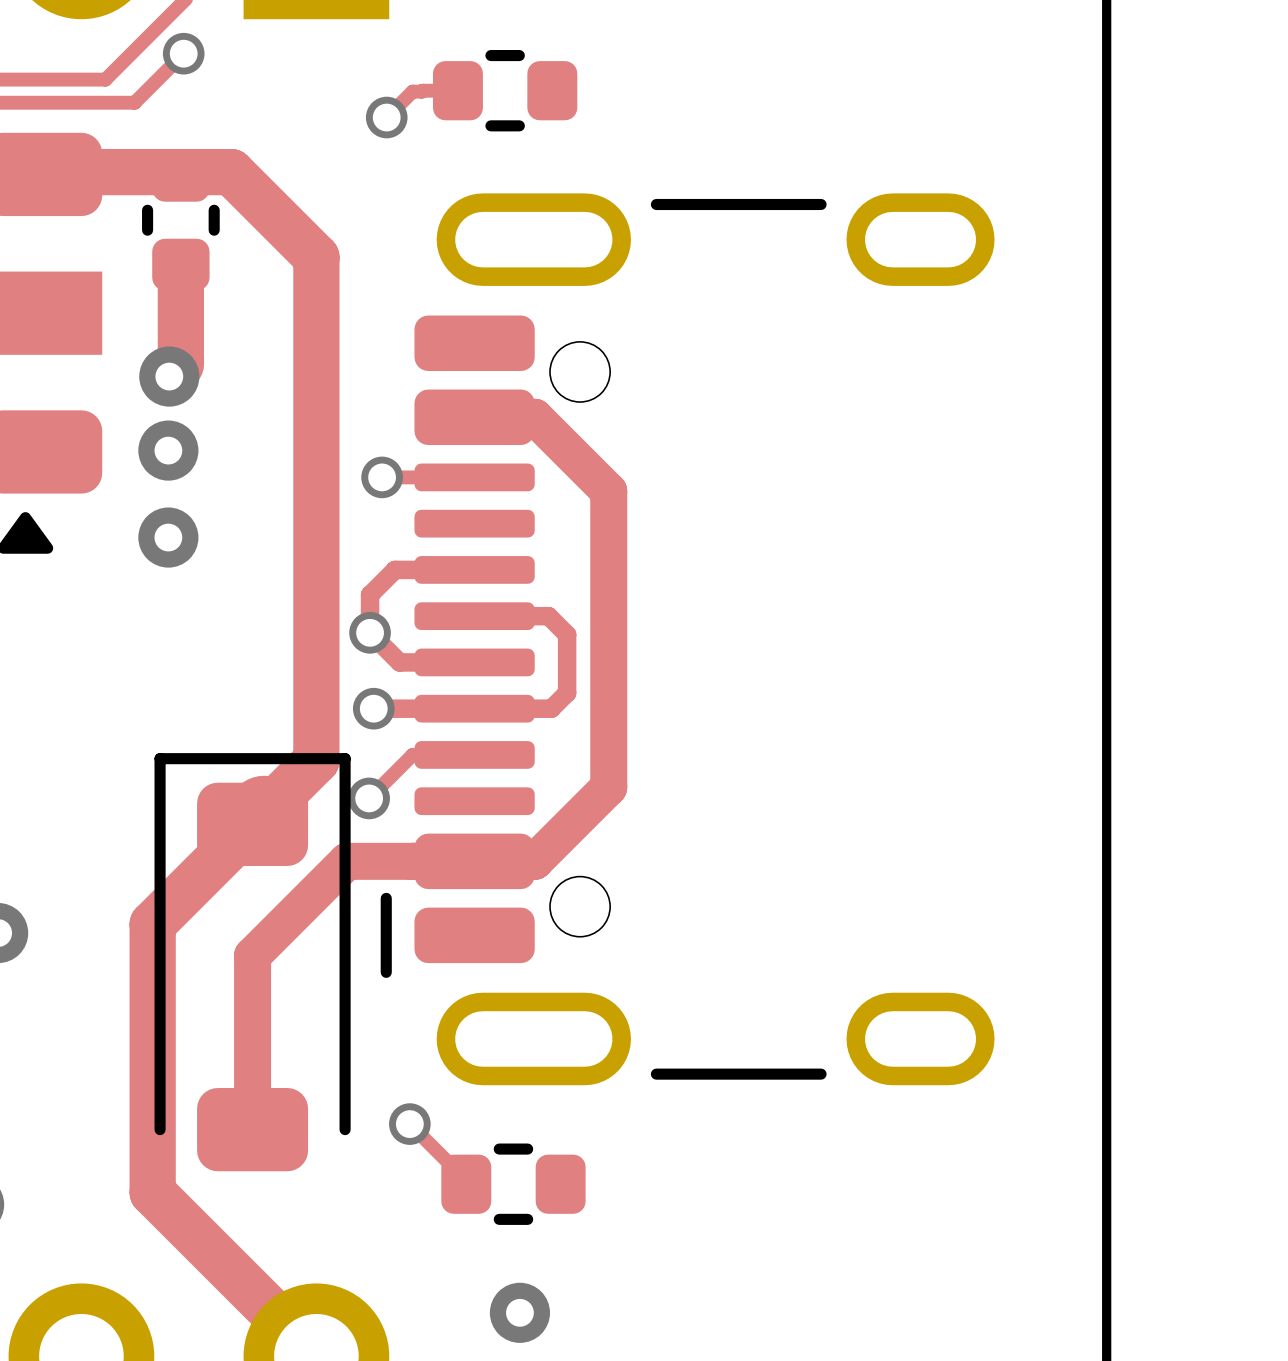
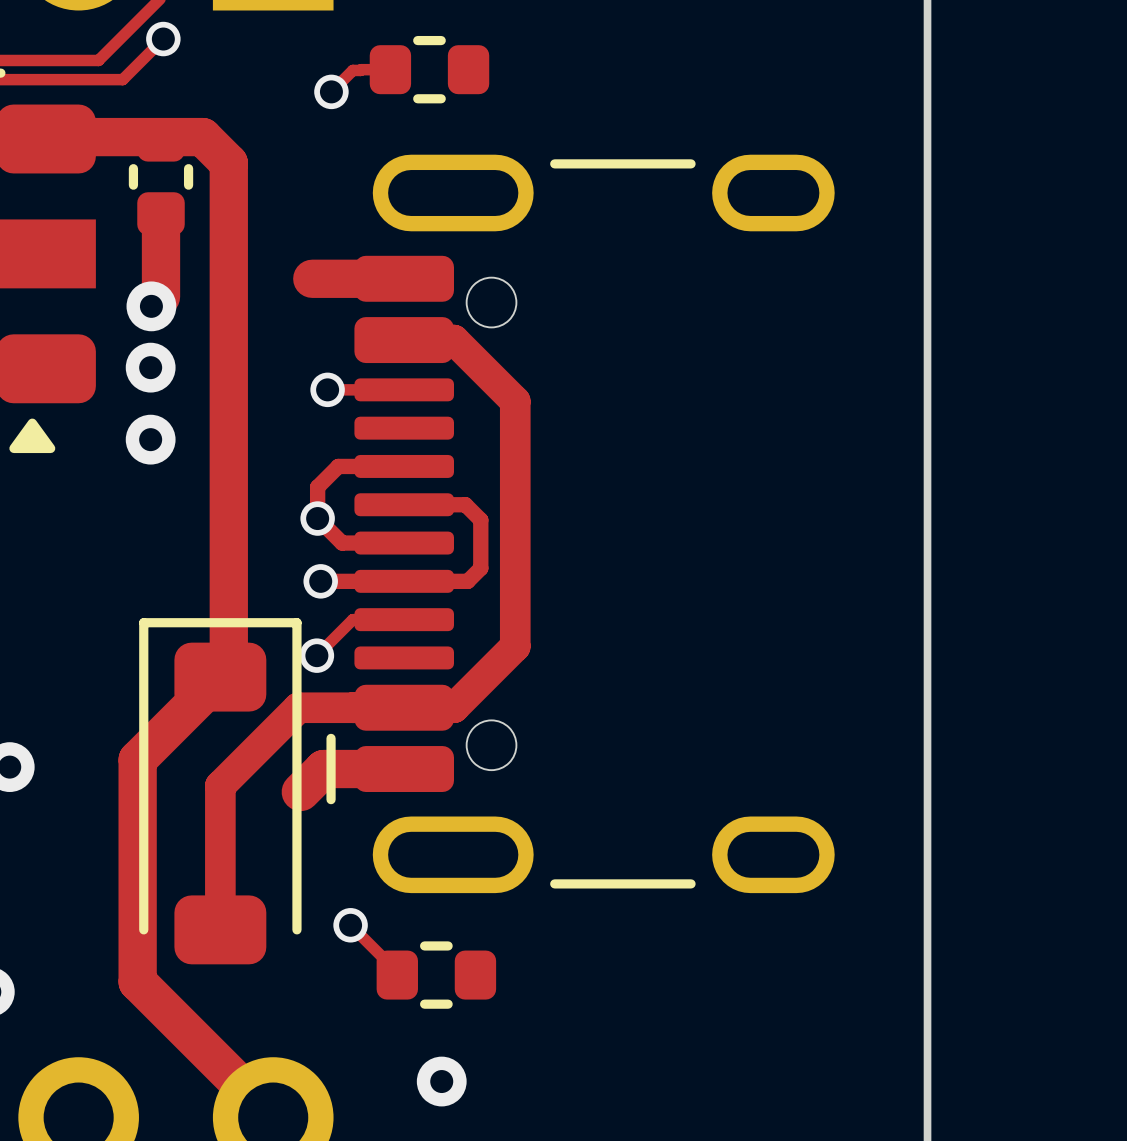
track: (262, 203) (316, 257) (316, 760) (264, 812) -> (228, 163) (229, 667)
track: none -> (312, 278) (404, 278)
track: none -> (404, 769) (323, 769) (300, 791)

